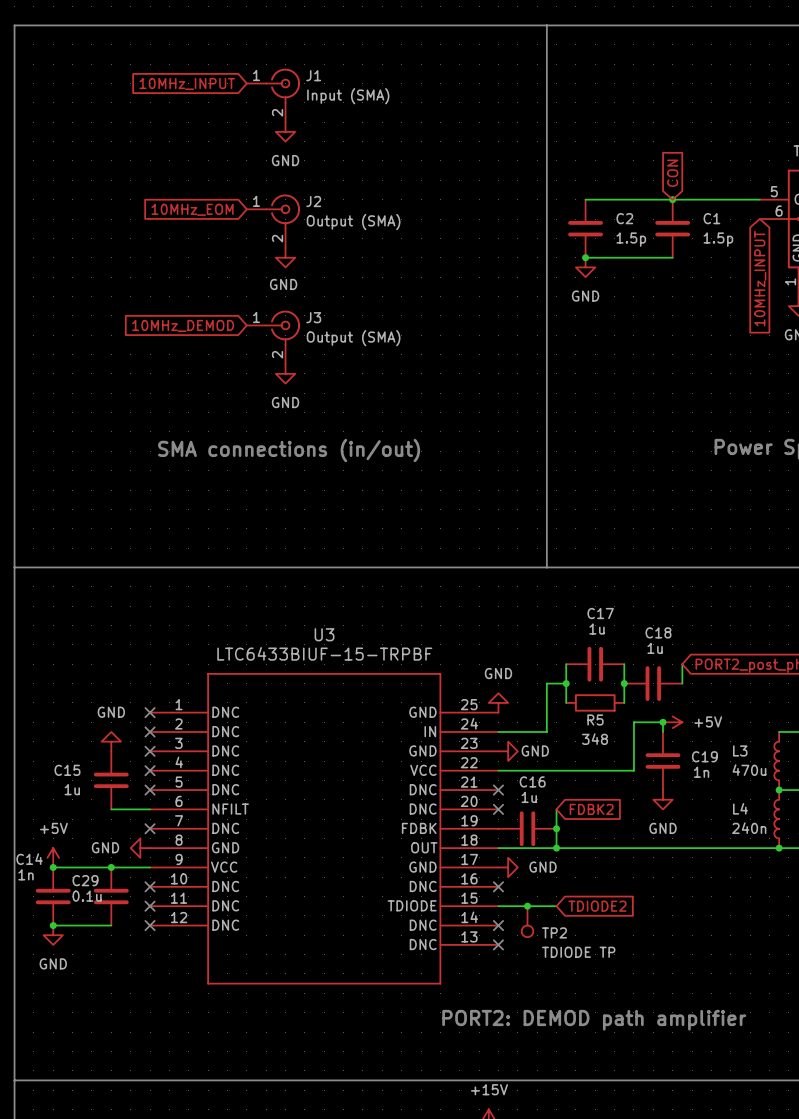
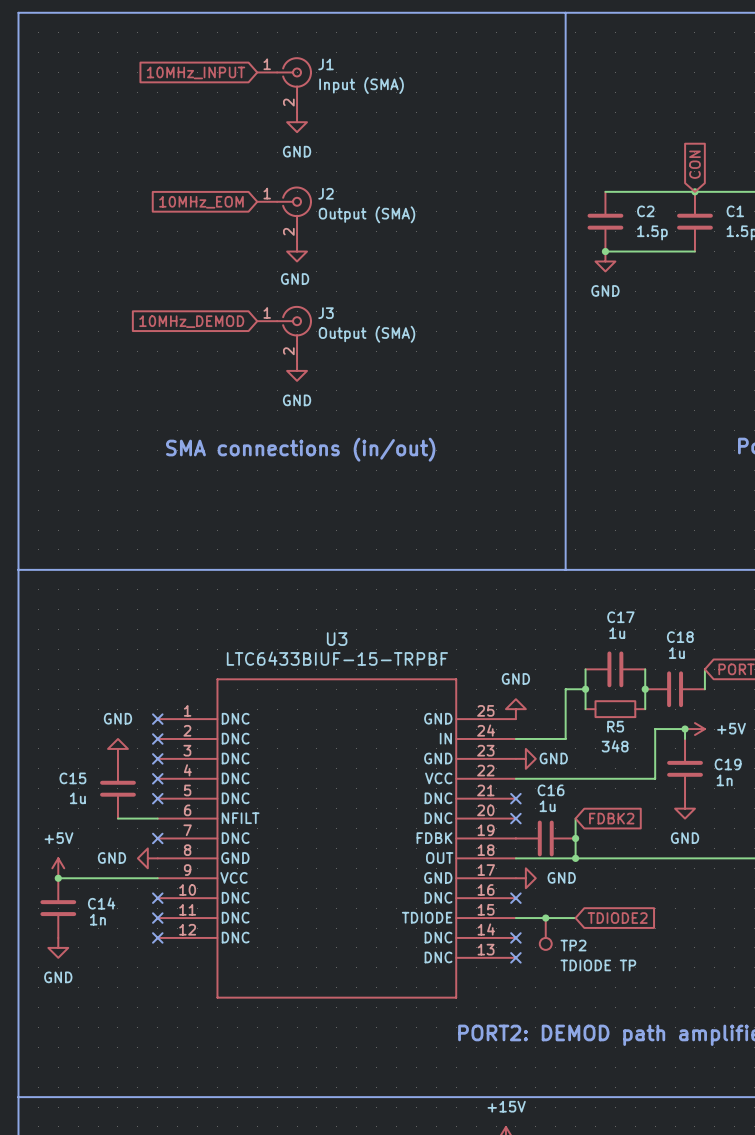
C14 name position: C14 (29, 859) -> C14 (101, 903)
junction: (111, 867) -> none
C14 value position: 1n (25, 874) -> 1n (97, 919)
C29: 0.1u (111, 896) -> none
wire: (53, 925) (111, 925) -> none
junction: (53, 925) -> none

